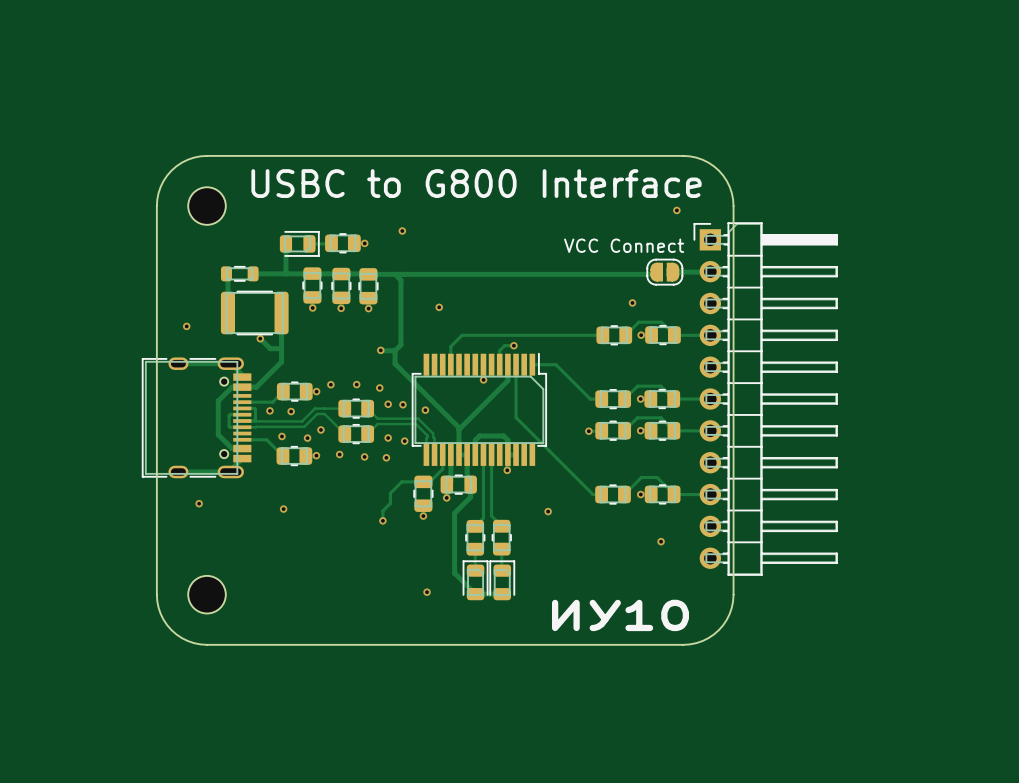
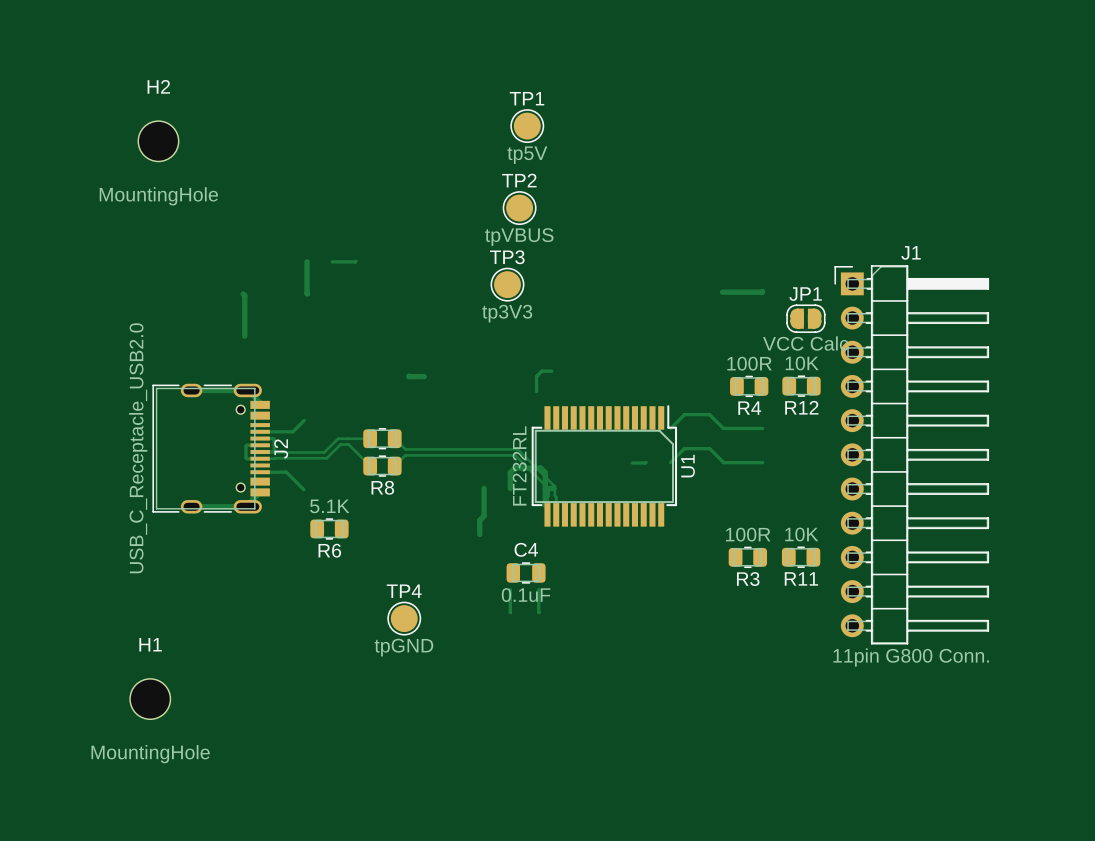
TP1: none -> tp5V (527, 126)
H2: none -> MountingHole (158, 141)
board edge: (207, 155) (683, 155) (702, 159) (718, 170) (729, 186) (733, 206) (733, 594) (729, 613) (718, 630) (702, 641) (683, 644) (207, 644) (187, 641) (171, 630) (160, 613) (156, 594) (157, 199) (163, 180) (176, 166) (194, 157) (207, 155) -> none
text: USBC to G800 Interface (476, 183) -> none
TP2: none -> tpVBUS (519, 208)
part: (207, 206) -> none
via: (676, 210) -> none
via: (402, 231) -> none
part: (299, 243) -> none
part: (342, 243) -> none
via: (364, 243) -> none
text: VCC Connect (624, 245) -> none
TP3: none -> tp3V3 (507, 284)
track: (656, 272) (654, 274) (253, 273) -> none
part: (664, 272) -> none
part: (239, 273) -> none
track: (395, 274) (400, 280) (400, 344) (395, 350) (395, 363) (459, 427) (459, 454) (467, 454) (467, 481) (470, 484) (470, 497) (454, 513) (454, 573) (475, 594) (502, 594) -> none
part: (312, 285) -> none
part: (341, 285) -> none
part: (368, 286) -> none
JP1: none -> VCC Calc (805, 318)
via: (632, 302) -> none
via: (312, 307) -> none
via: (439, 307) -> none
via: (341, 308) -> none
via: (368, 308) -> none
part: (254, 313) -> none
track: (281, 313) (281, 361) (256, 387) (232, 387) (218, 400) (218, 434) (232, 448) (242, 448) -> none
via: (186, 326) -> none
track: (602, 335) (462, 335) (450, 346) (450, 364) -> none
part: (614, 335) -> none
track: (625, 335) (638, 322) (661, 322) (674, 335) (710, 335) -> none
via: (641, 335) -> none
part: (663, 335) -> none
track: (260, 338) (270, 348) (281, 348) -> none
via: (260, 338) -> none
via: (513, 345) -> none
via: (380, 350) -> none
R4: none -> 100R (749, 386)
R12: none -> 10K (801, 386)
track: (507, 364) (507, 380) (459, 429) -> none
track: (516, 364) (516, 417) (593, 494) (601, 494) -> none
track: (532, 364) (555, 364) (590, 399) (601, 399) -> none
via: (483, 379) -> none
via: (330, 384) -> none
via: (356, 384) -> none
via: (379, 387) -> none
part: (294, 391) -> none
via: (316, 391) -> none
part: (613, 399) -> none
via: (640, 399) -> none
part: (662, 399) -> none
part: (765, 399) -> none
via: (388, 404) -> none
via: (402, 404) -> none
part: (479, 409) -> none
via: (269, 410) -> none
via: (425, 410) -> none
via: (291, 411) -> none
J2 value: none -> USB_C_Receptacle_USB2.0 (138, 448)
J2 name: none -> J2 (281, 448)
track: (377, 418) (418, 418) (433, 433) (434, 454) -> (405, 449) (517, 449) (554, 486) (556, 514)
J1: none -> 11pin G800 Conn. (911, 454)
track: (377, 424) (415, 424) (427, 435) (426, 454) -> (405, 455) (515, 455) (548, 489) (547, 514)
via: (320, 429) -> none
part: (613, 430) -> none
via: (640, 430) -> none
part: (662, 430) -> none
via: (588, 431) -> none
U1: none -> FT232RL (604, 465)
via: (281, 436) -> none
via: (388, 437) -> none
via: (307, 438) -> none
via: (404, 441) -> none
via: (339, 454) -> none
R8 name: none -> R8 (382, 487)
track: (442, 454) (442, 469) (429, 481) (401, 481) (390, 493) (390, 503) (382, 510) (382, 520) -> none
track: (483, 454) (483, 518) (475, 526) -> none
track: (491, 454) (491, 516) (501, 526) -> none
via: (316, 455) -> none
part: (294, 456) -> none
via: (364, 456) -> none
via: (386, 457) -> none
via: (507, 470) -> none
part: (458, 484) -> none
R6: none -> 5.1K (329, 528)
part: (423, 493) -> none
part: (613, 494) -> none
track: (624, 494) (641, 477) (657, 477) (674, 494) (710, 494) -> none
via: (640, 494) -> none
part: (662, 494) -> none
via: (446, 497) -> none
via: (199, 503) -> none
via: (283, 509) -> none
via: (548, 511) -> none
via: (423, 516) -> none
R11: none -> 10K (801, 557)
R3: none -> 100R (747, 557)
via: (382, 520) -> none
C4: none -> 0.1uF (526, 572)
part: (475, 537) -> none
part: (501, 537) -> none
via: (661, 541) -> none
TP4: none -> tpGND (404, 618)
part: (475, 580) -> none
part: (502, 580) -> none
via: (427, 592) -> none
part: (207, 594) -> none
text: ИУ10 (620, 615) -> none
H1: none -> MountingHole (150, 699)

